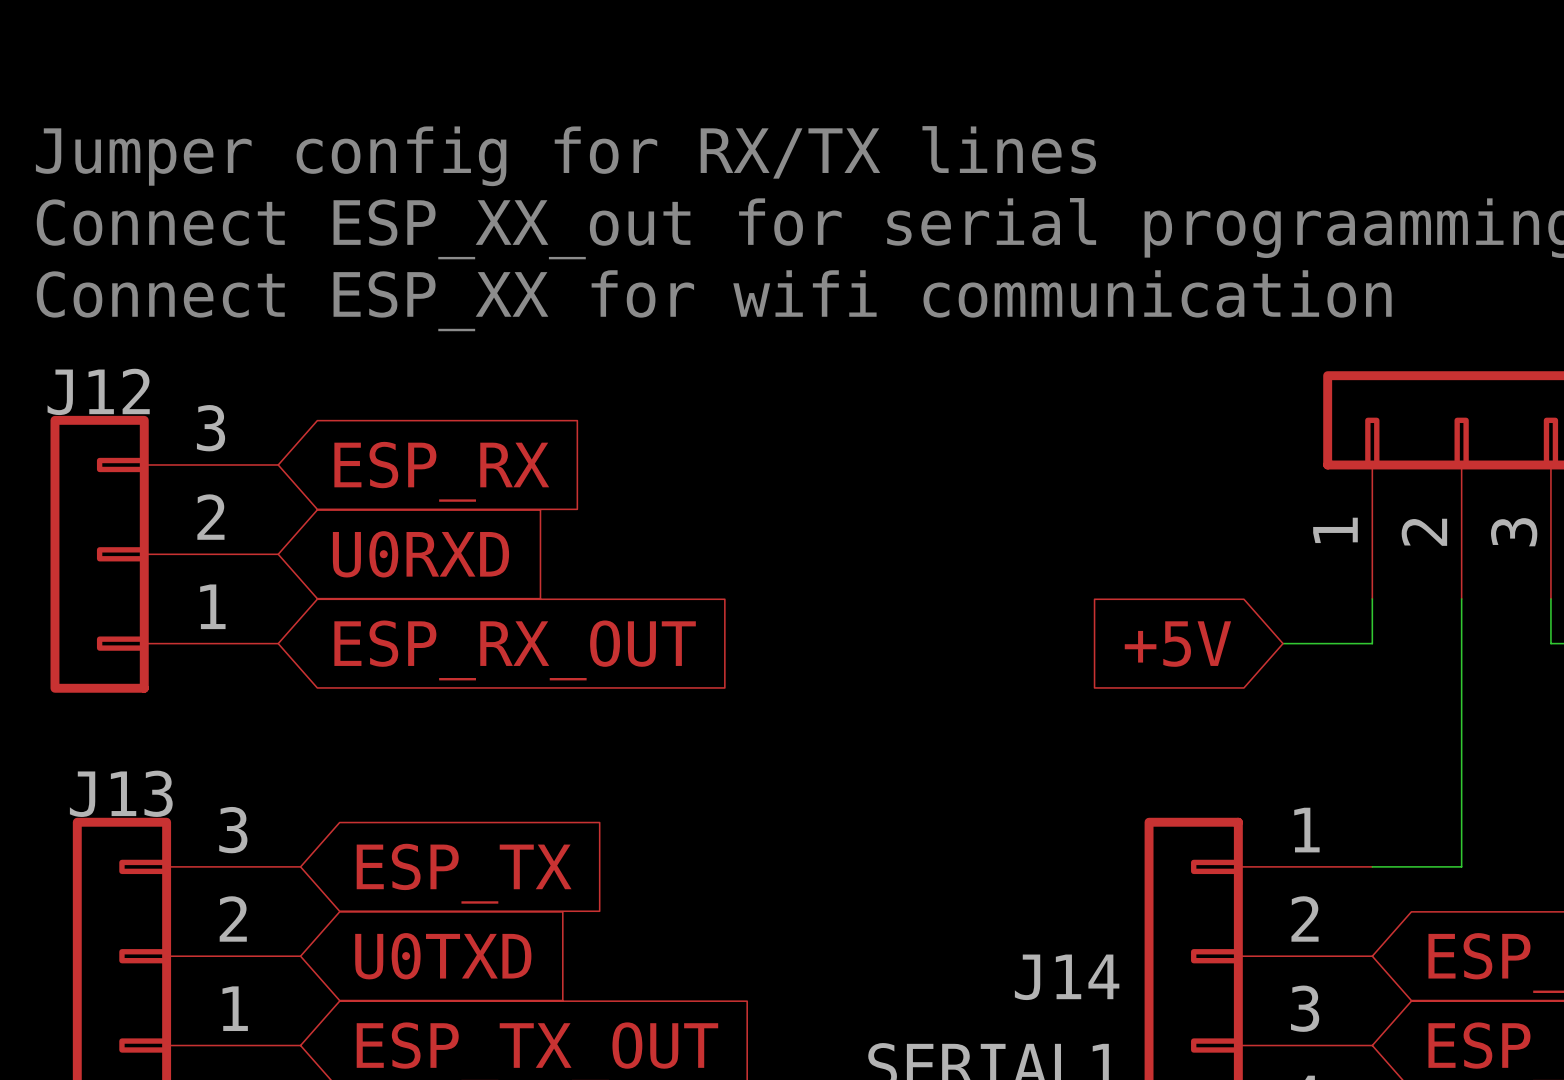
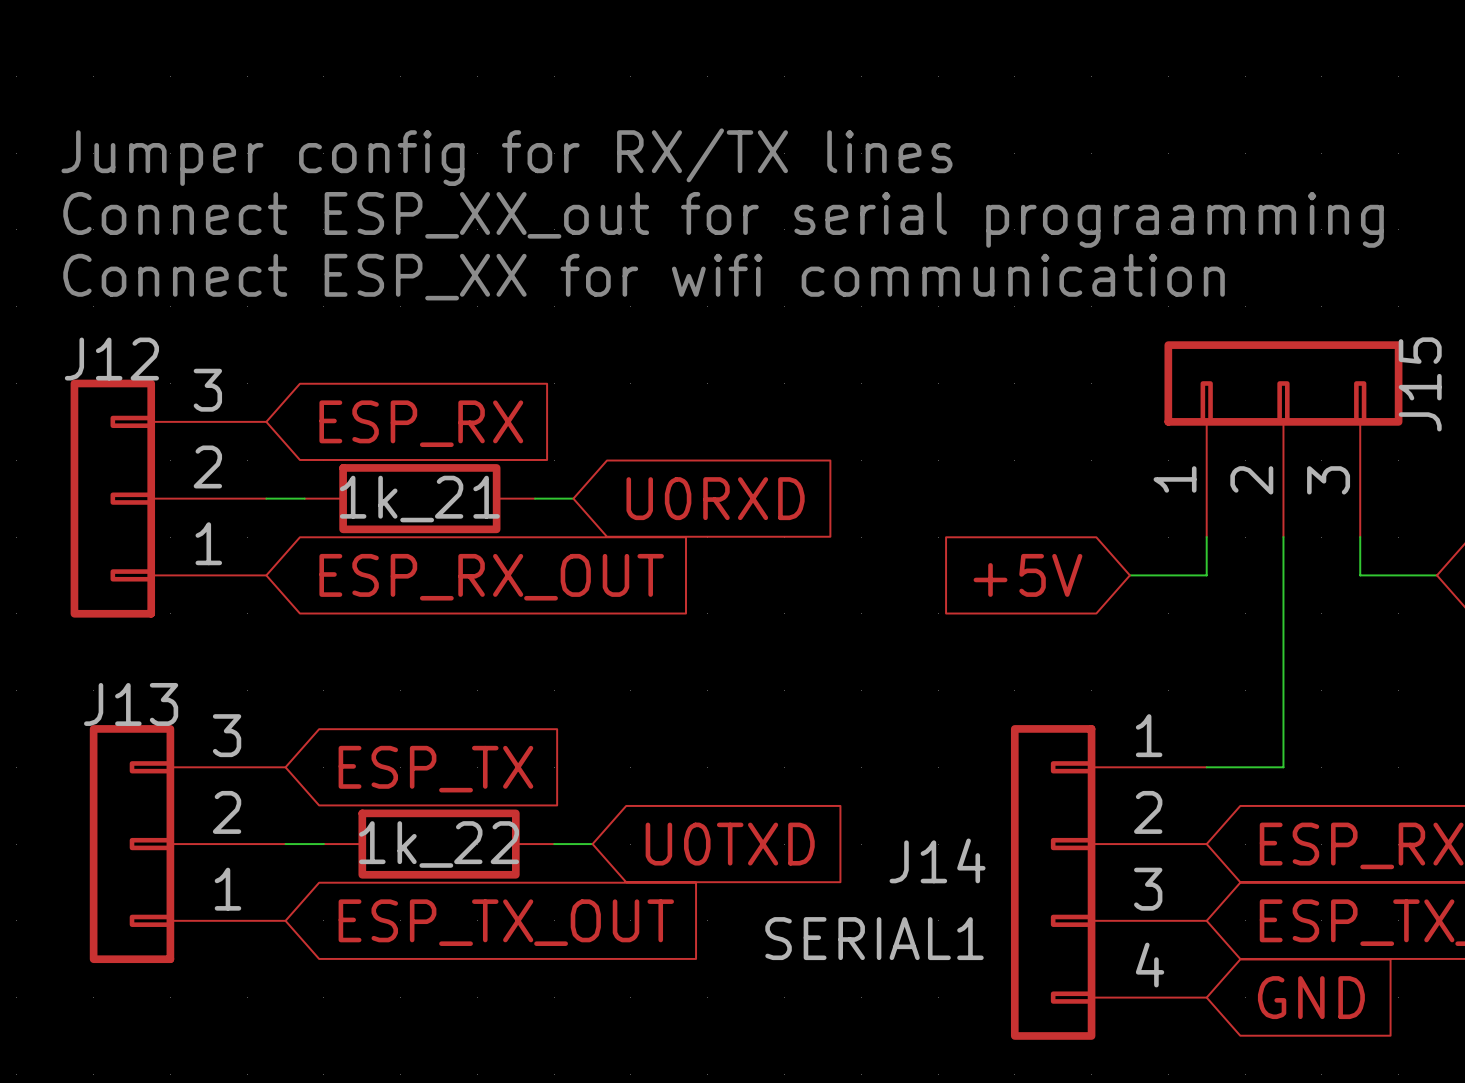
wire: none -> (266, 498) (304, 498)
global label position: U0RXD (420, 554) -> U0RXD (715, 498)
1k_21: none -> (419, 498)
wire: none -> (535, 498) (573, 498)
wire: none -> (285, 844) (323, 844)
global label position: U0TXD (443, 956) -> U0TXD (730, 844)
1k_22: none -> (439, 844)
wire: none -> (554, 844) (592, 844)

